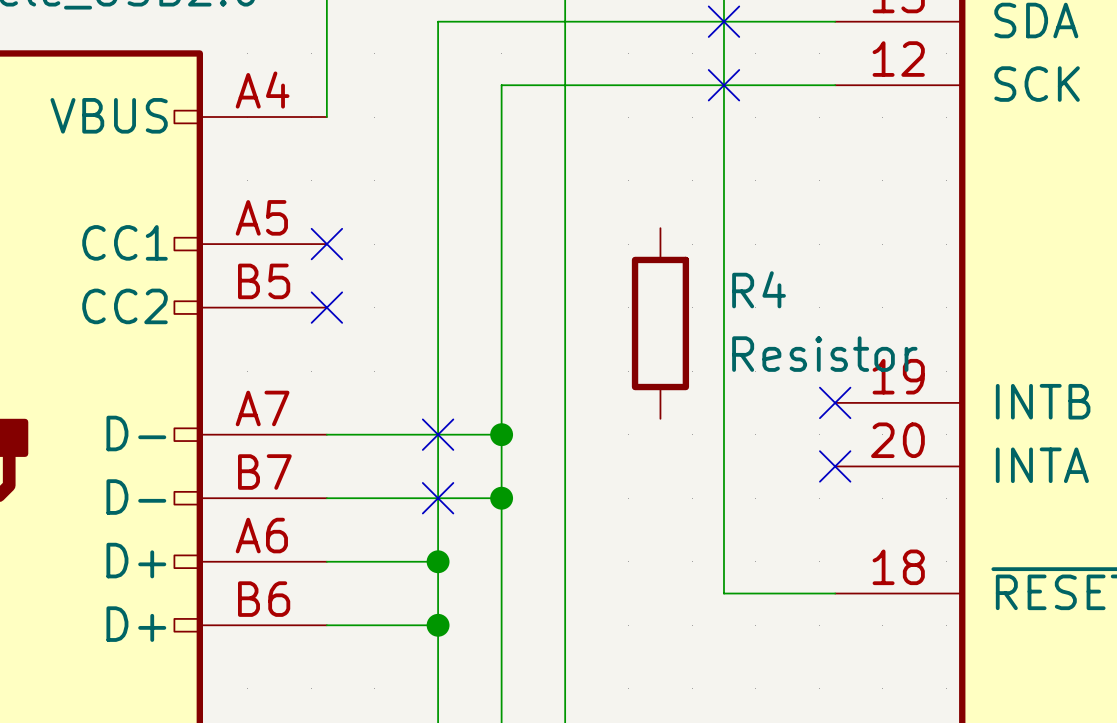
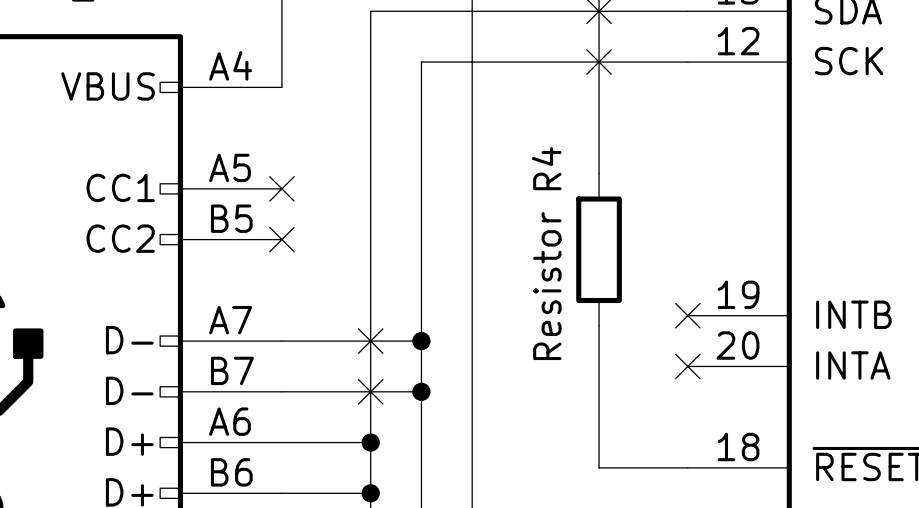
wire: (723, 225) (723, 415) -> none
R4 name rotation: 0° (759, 289) -> 90° counterclockwise (546, 168)
R4 name position: R4 (759, 289) -> R4 (546, 168)
R4 position: (660, 323) -> (599, 249)
R4 value rotation: 0° (824, 354) -> 90° counterclockwise (547, 286)

